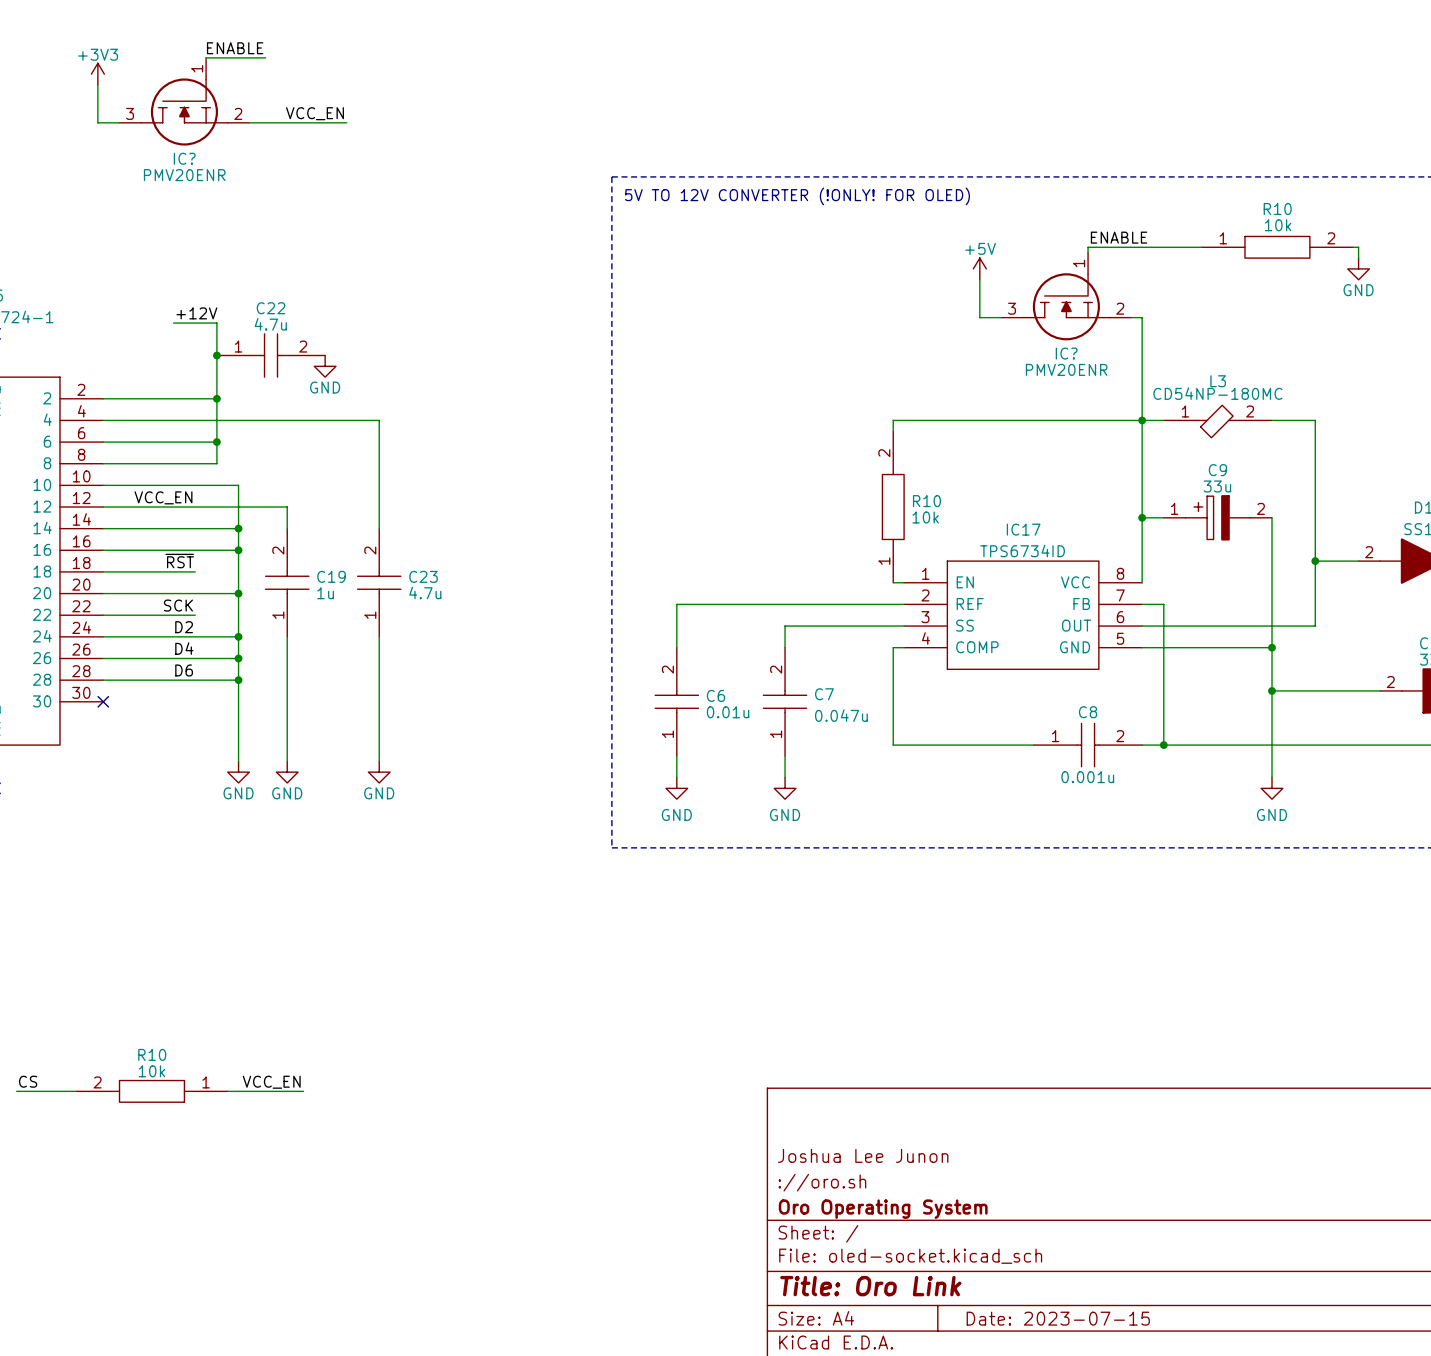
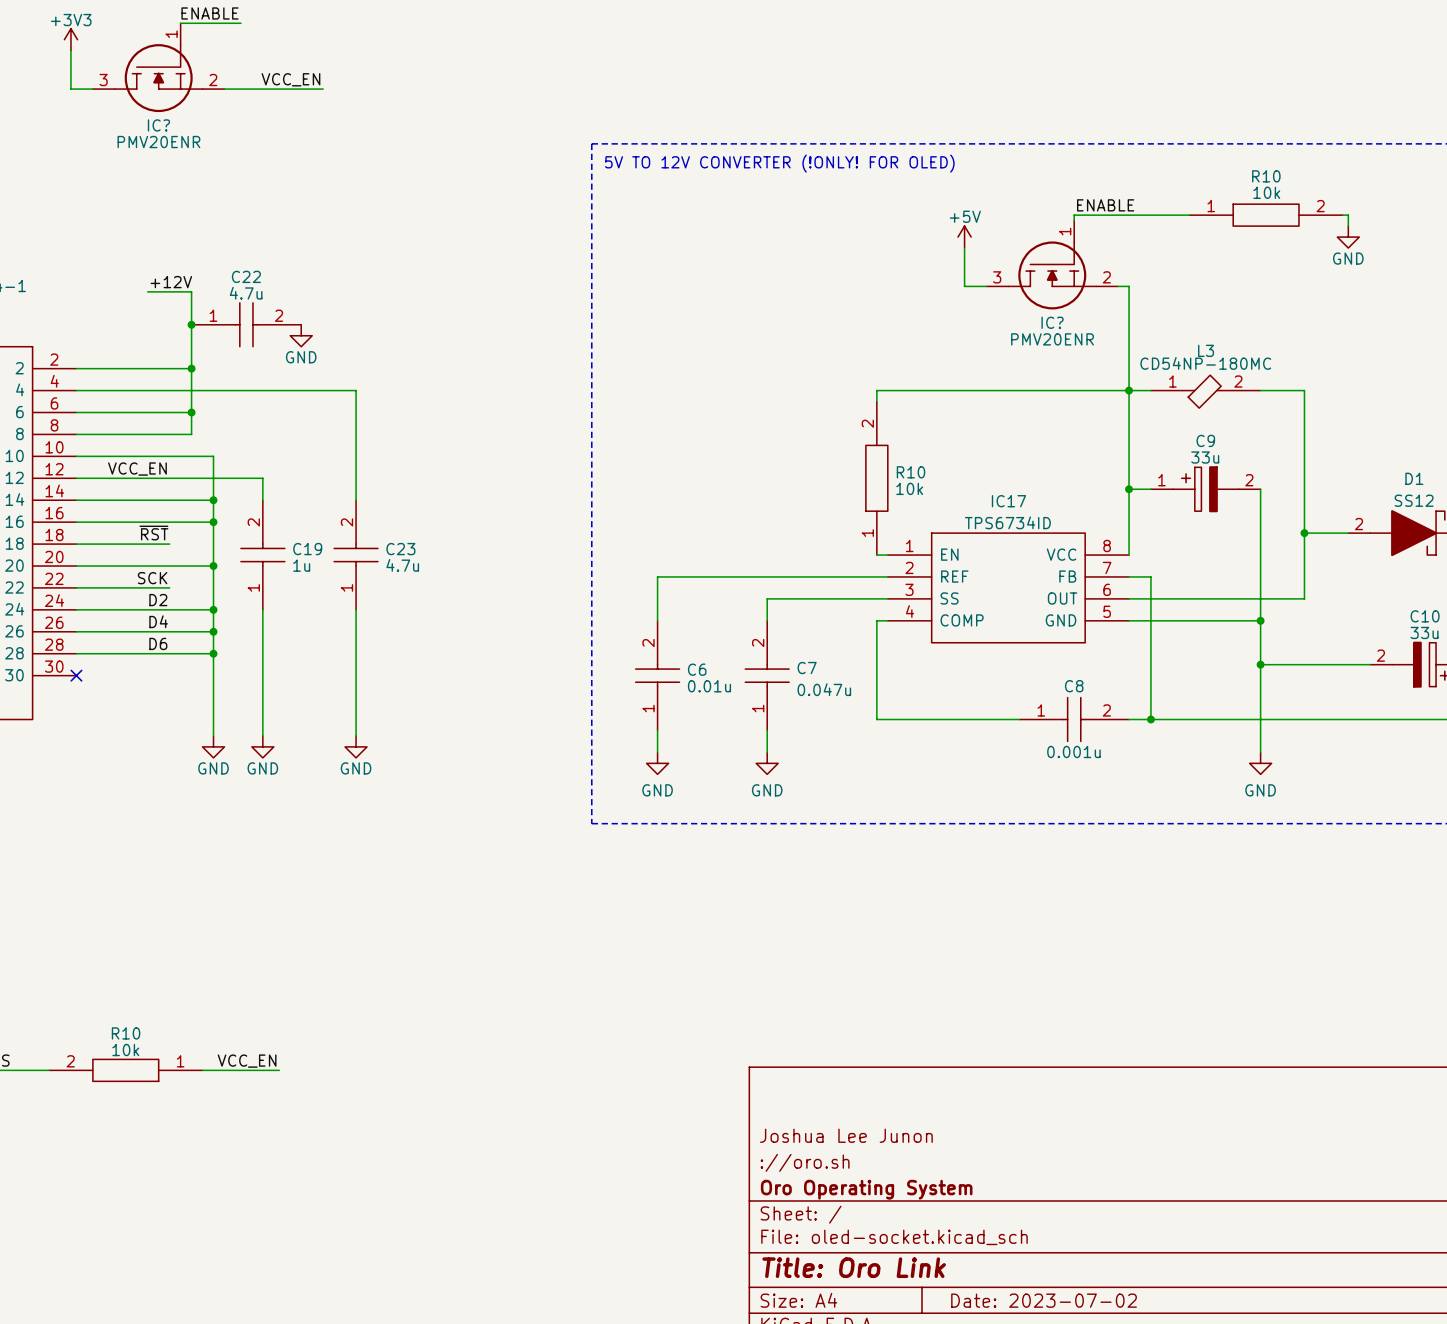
title block: Date: 2023-07-15 (1058, 1318) -> Date: 2023-07-02 (1044, 1300)

